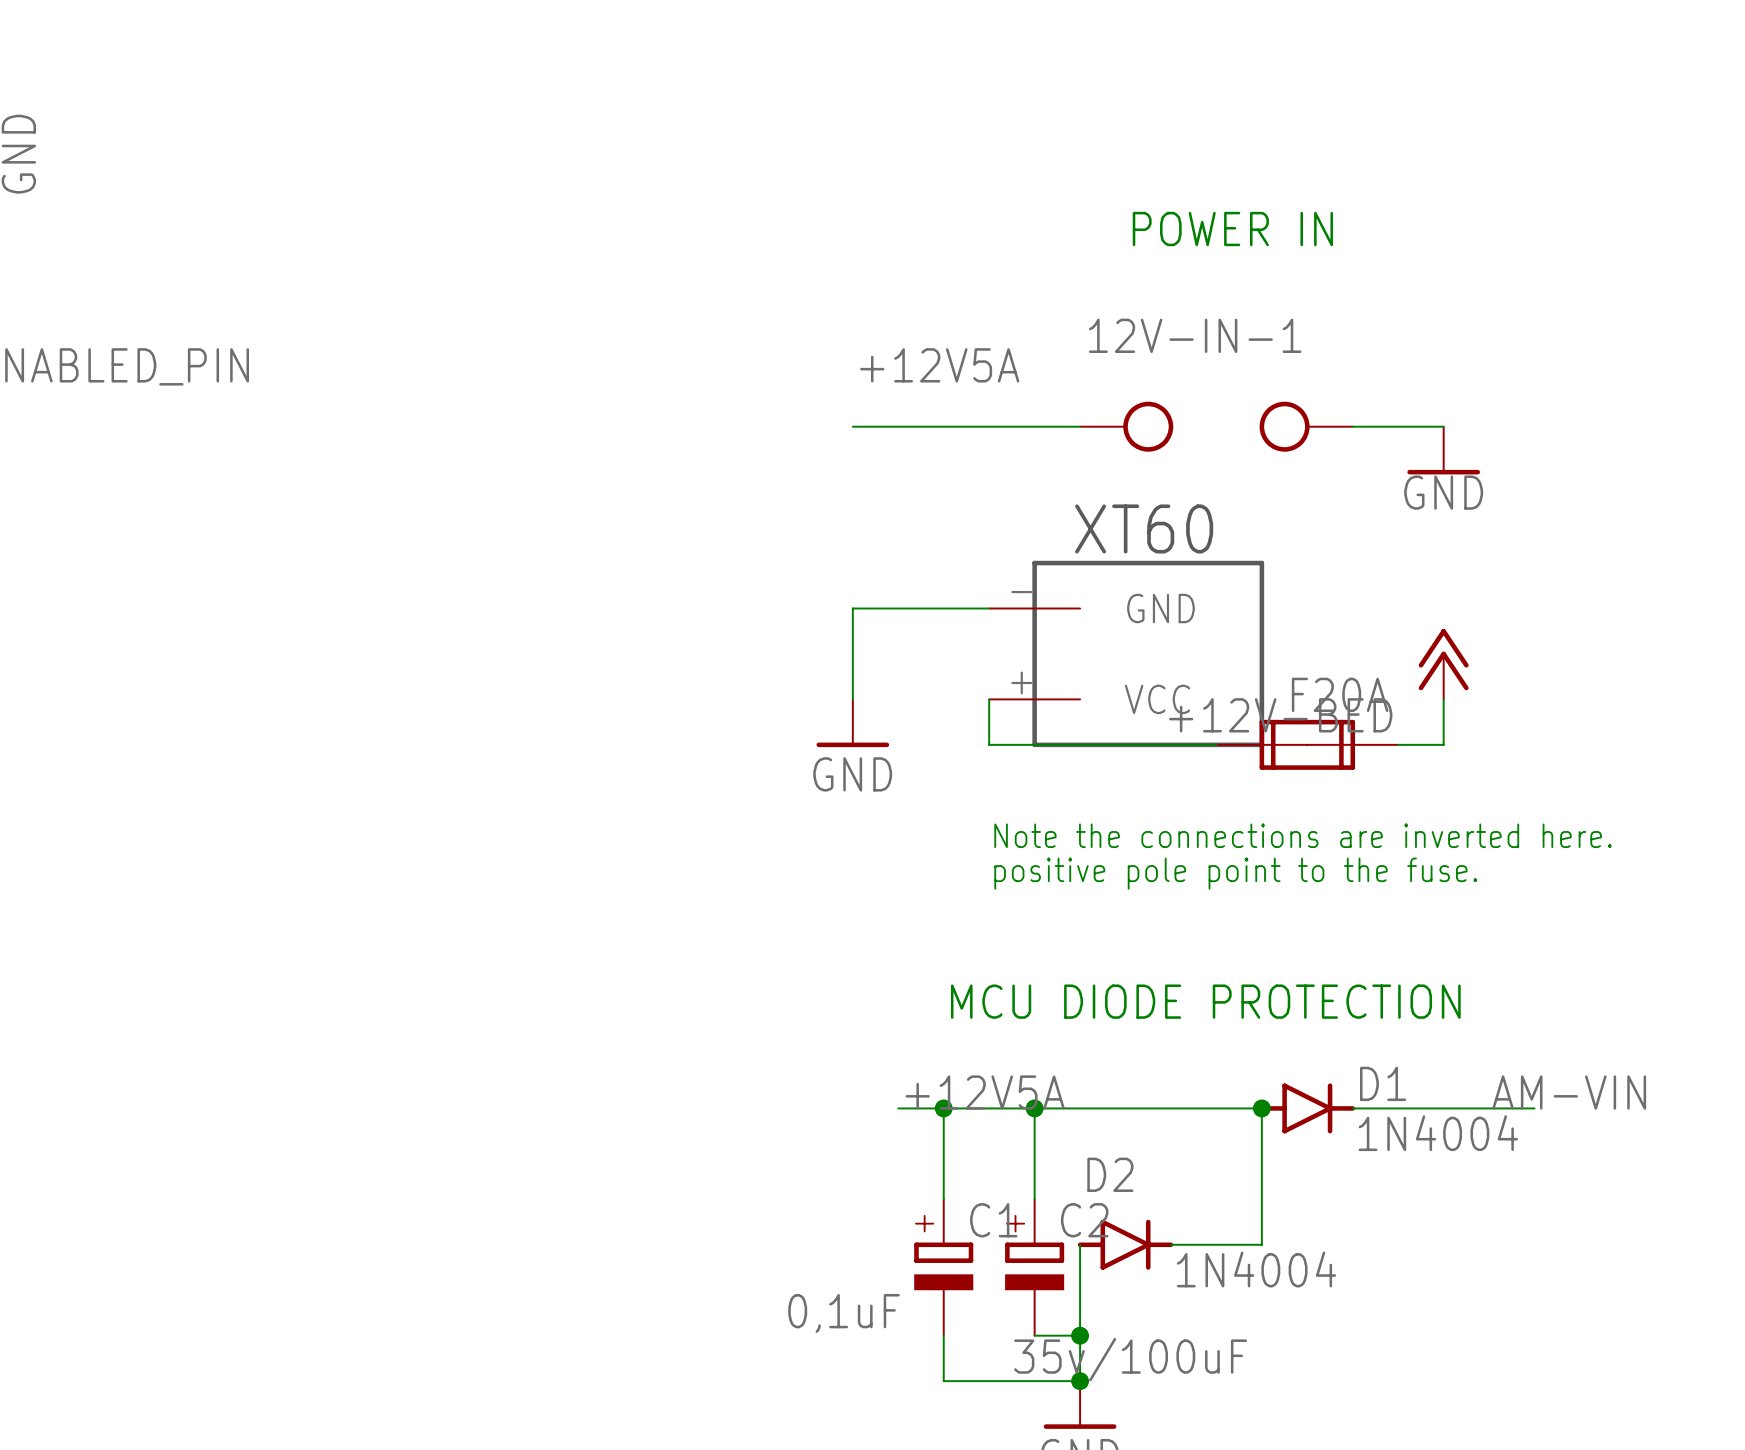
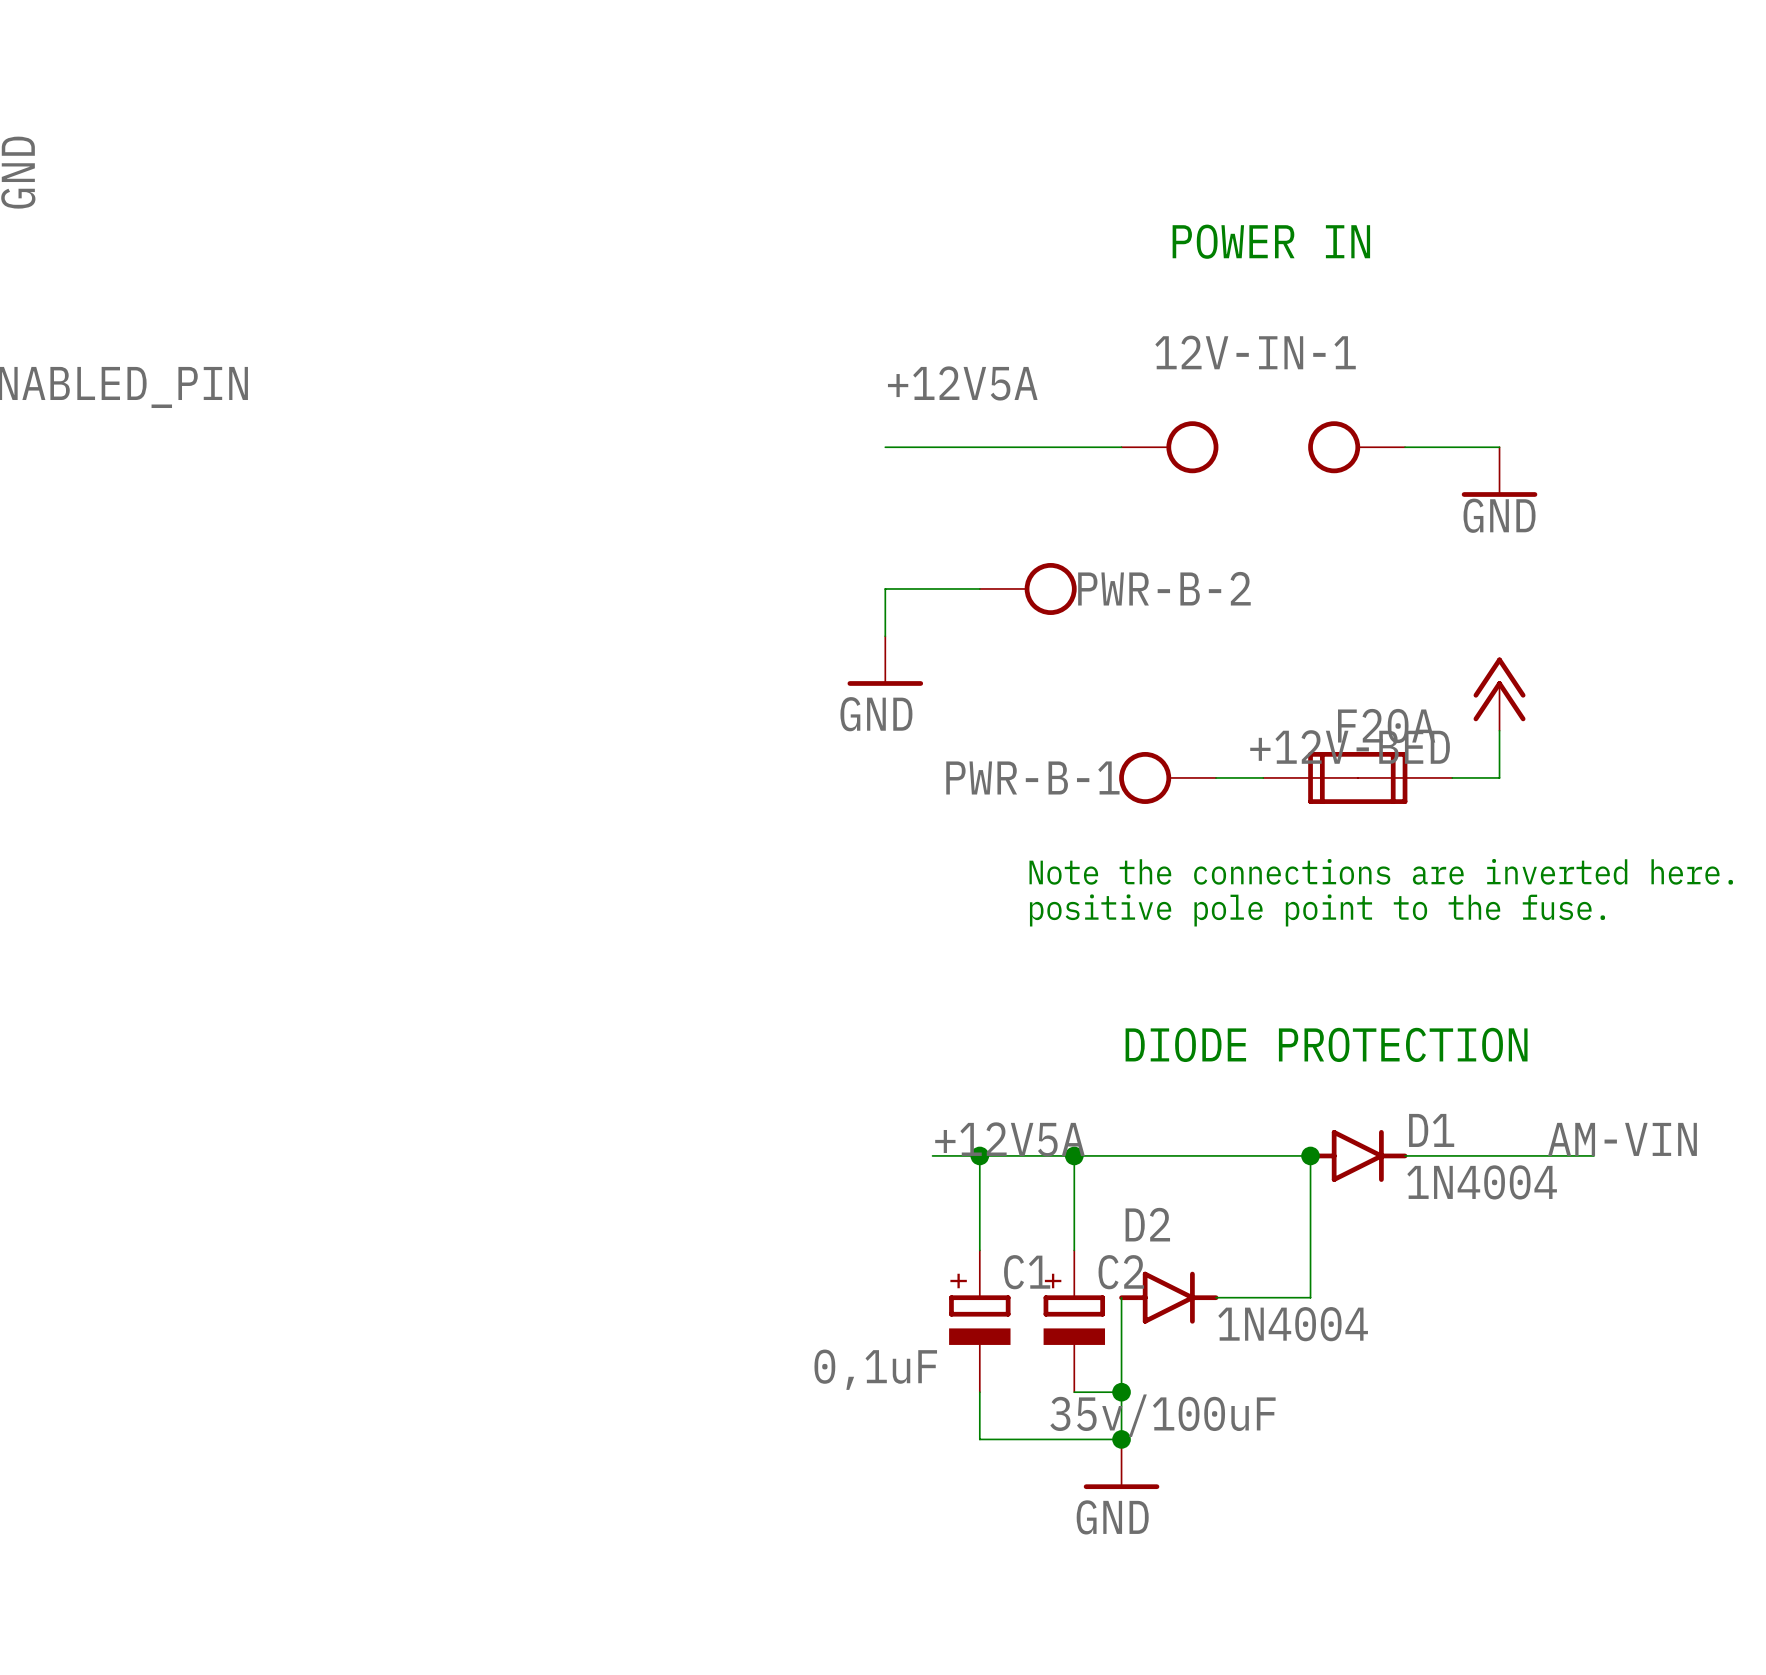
wire: none -> (979, 588) (885, 588) (885, 636)
PWR-B-2: none -> (1028, 588)
wire: (989, 608) (852, 608) (852, 699) -> none
part: (1126, 653) -> none
wire: (989, 699) (989, 744) (1170, 744) -> none
power symbol position: GND (852, 723) -> GND (885, 661)
PWR-B-1: none -> (1167, 777)
text: MCU DIODE PROTECTION (1205, 1001) -> DIODE PROTECTION (1326, 1044)

